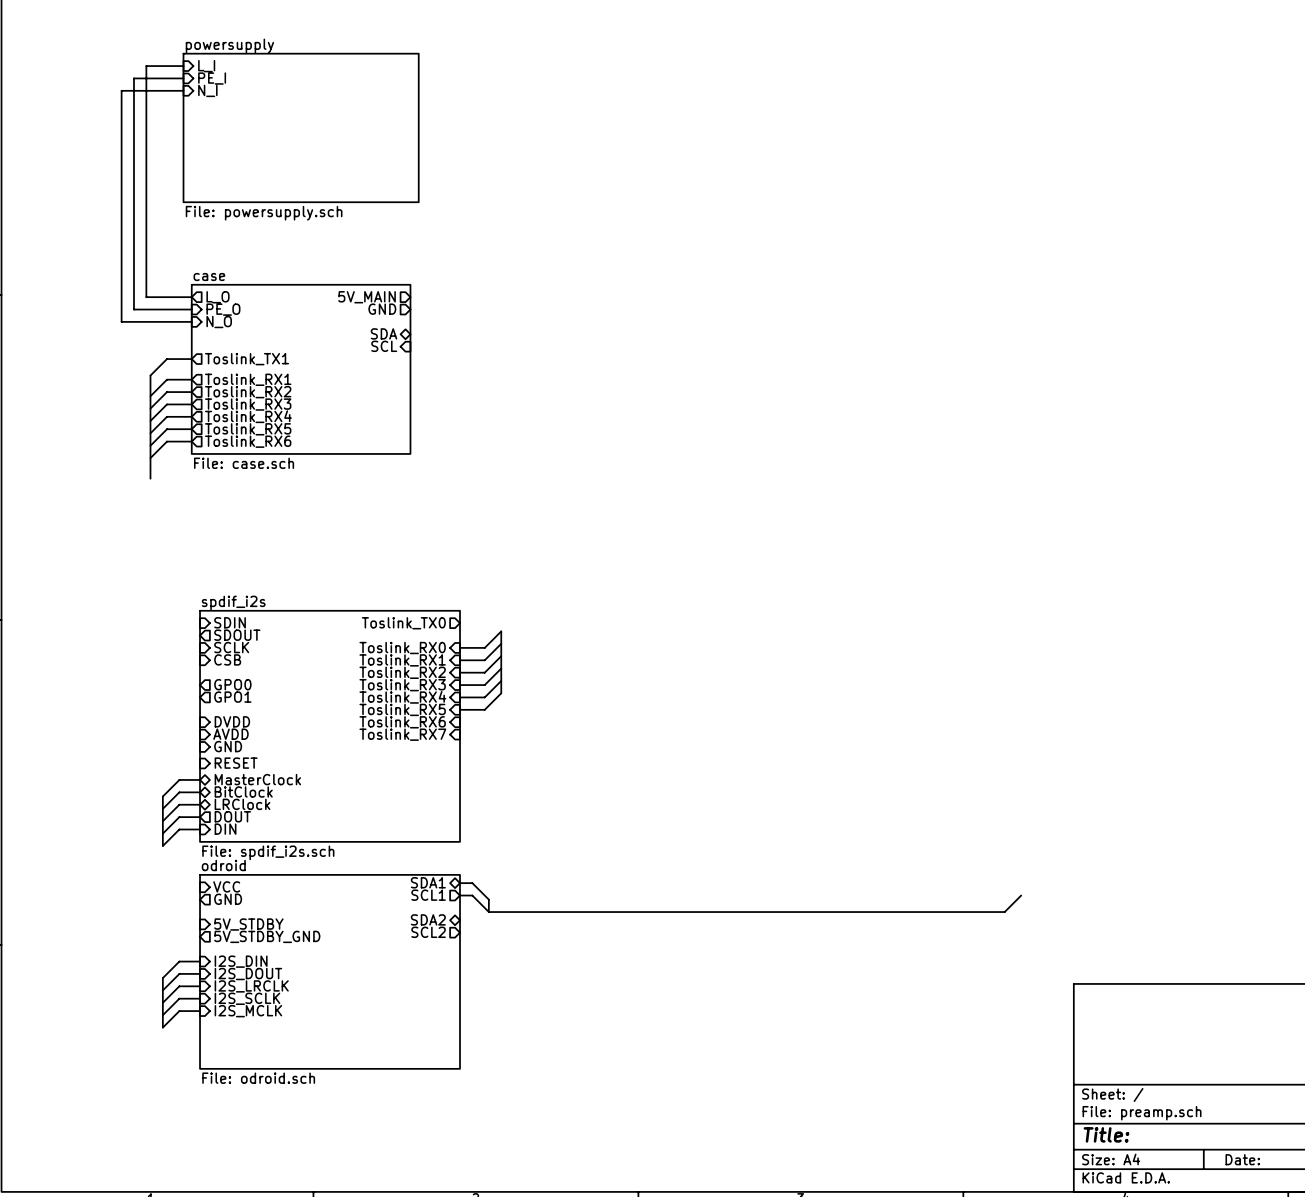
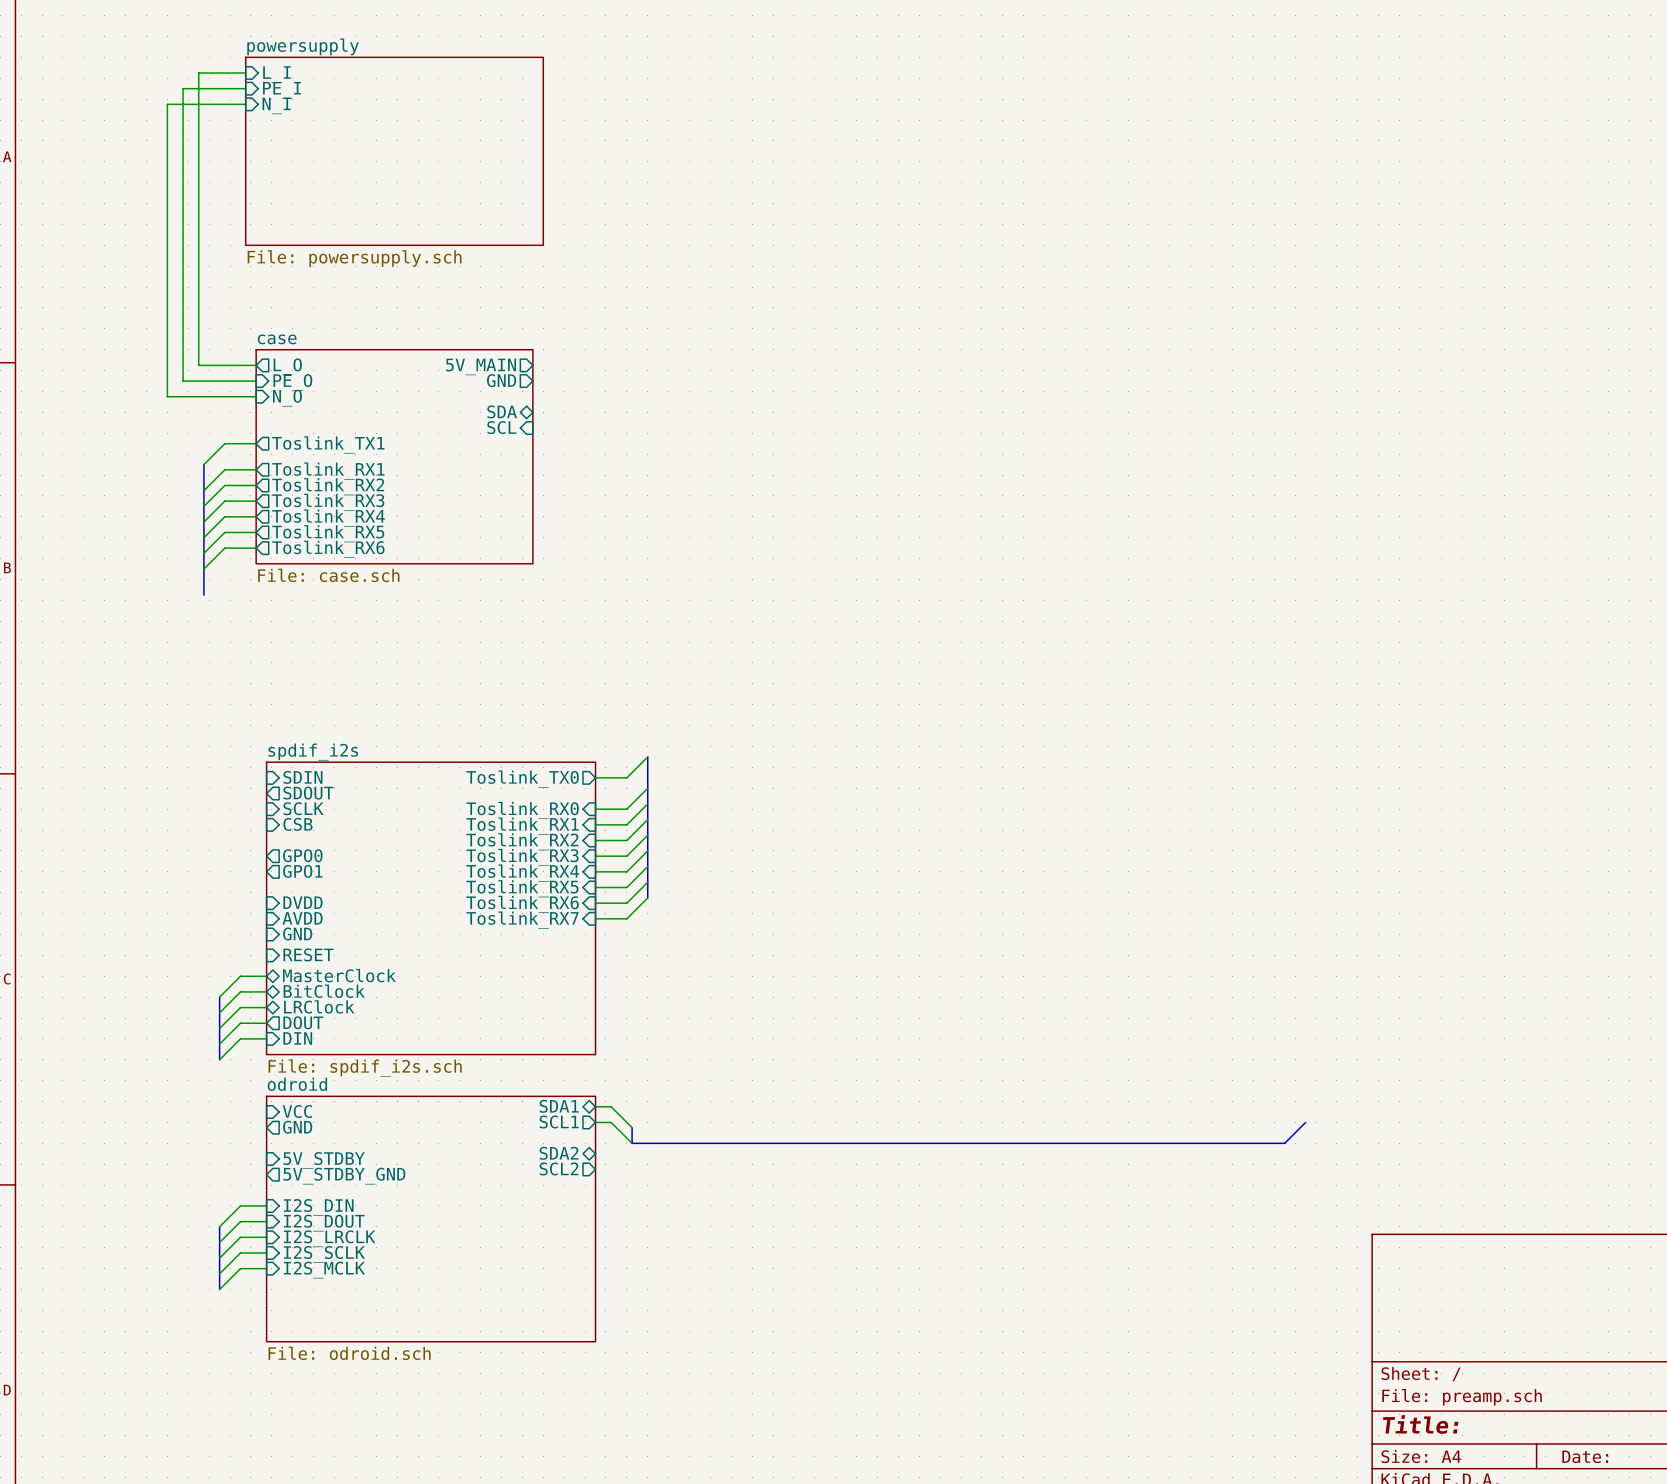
wire: none -> (647, 756) (626, 777) (595, 777)
bus: none -> (647, 756) (647, 788)
bus: none -> (647, 866) (647, 897)
wire: none -> (647, 882) (626, 903) (595, 903)
wire: none -> (647, 897) (626, 918) (595, 918)

